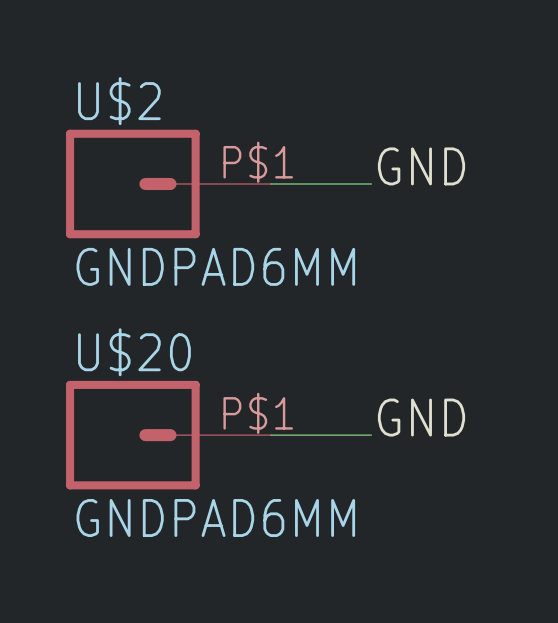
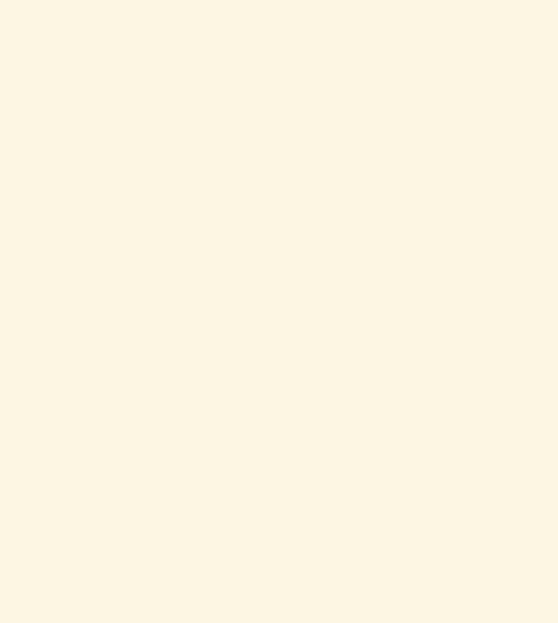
label: GND (421, 166) -> none
U$2: GNDPAD6MM (168, 183) -> none
wire: (270, 183) (371, 183) -> none
label: GND (421, 417) -> none
U$20: GNDPAD6MM (168, 435) -> none
wire: (270, 435) (371, 435) -> none

